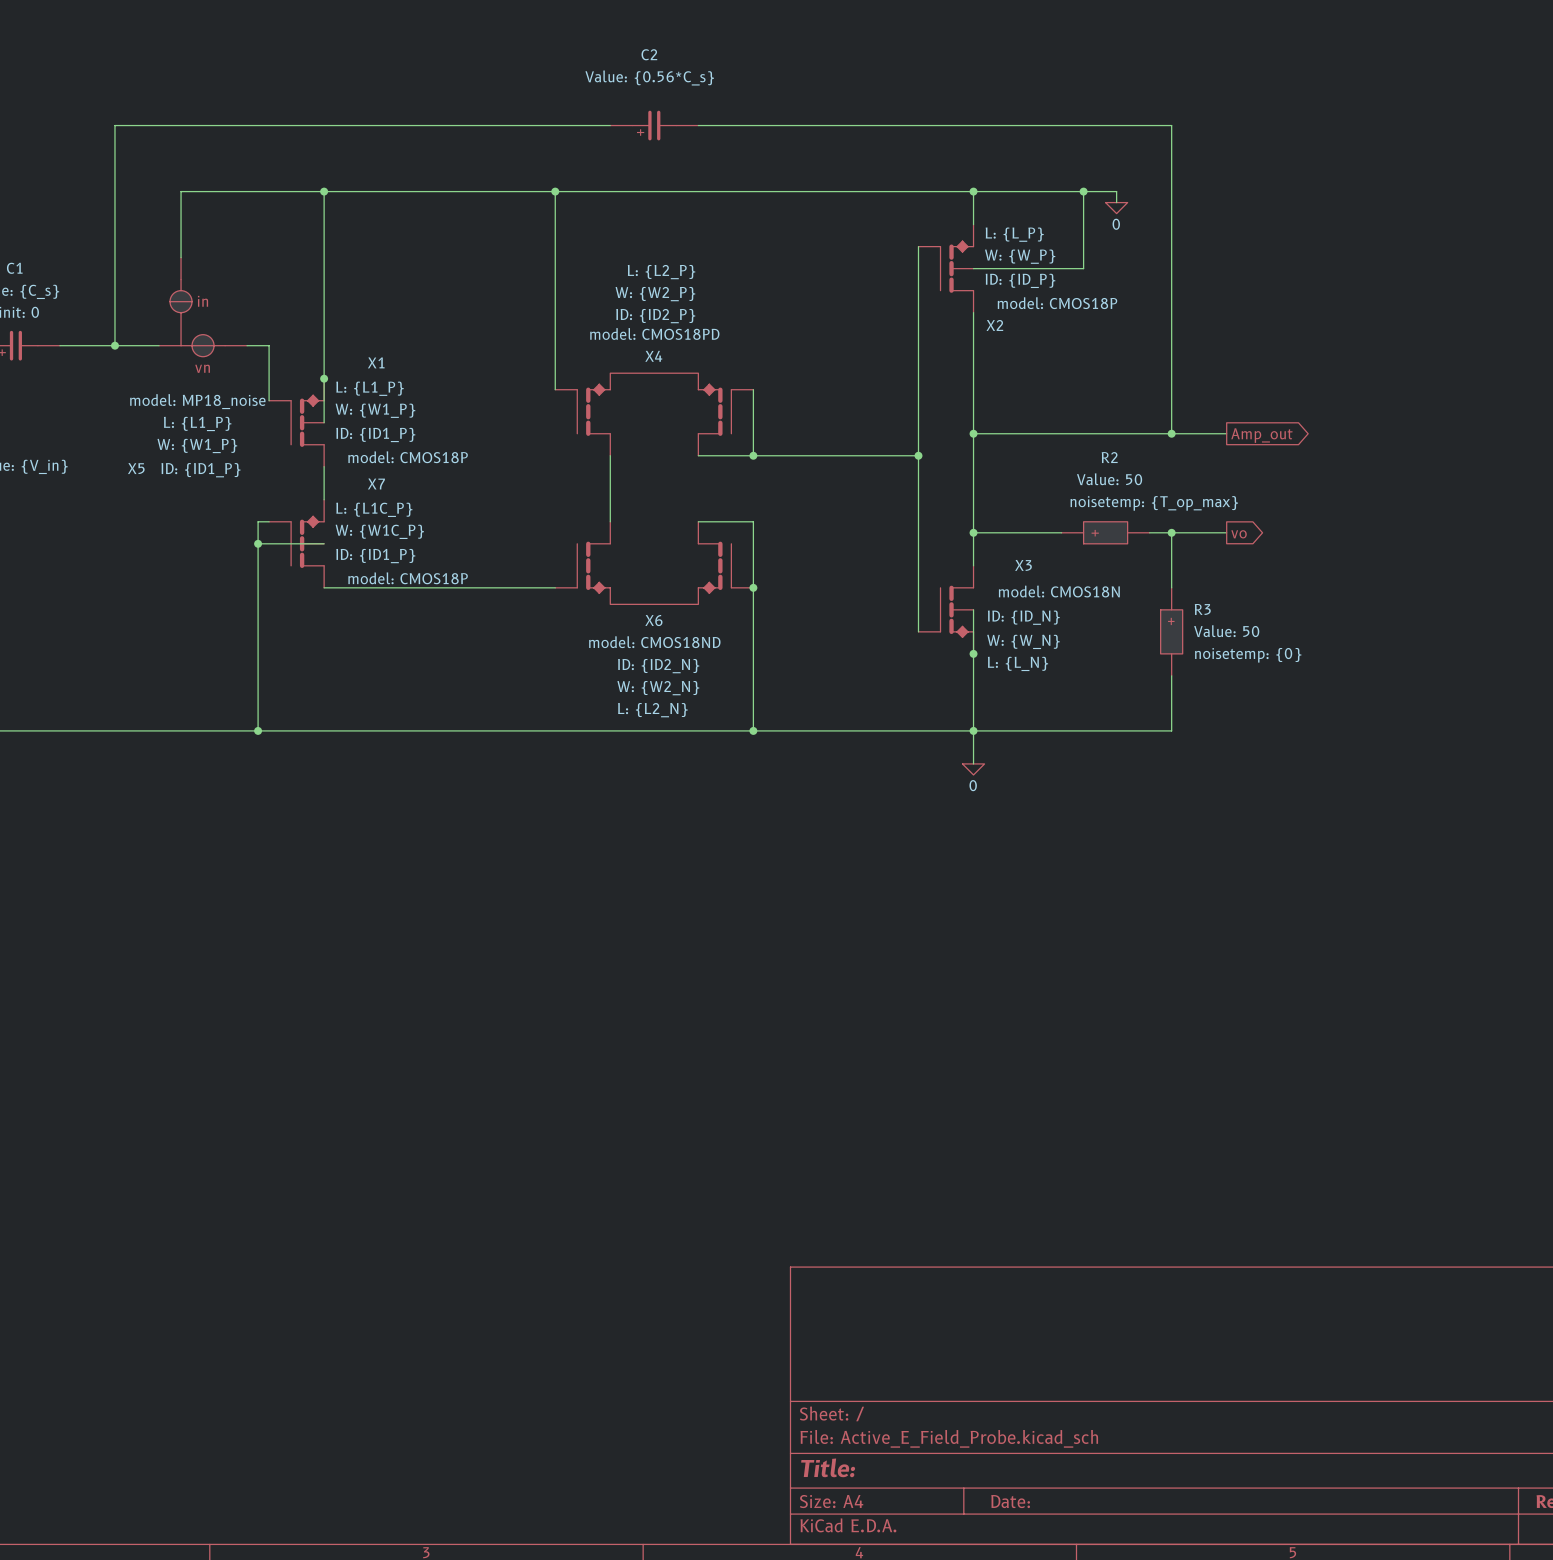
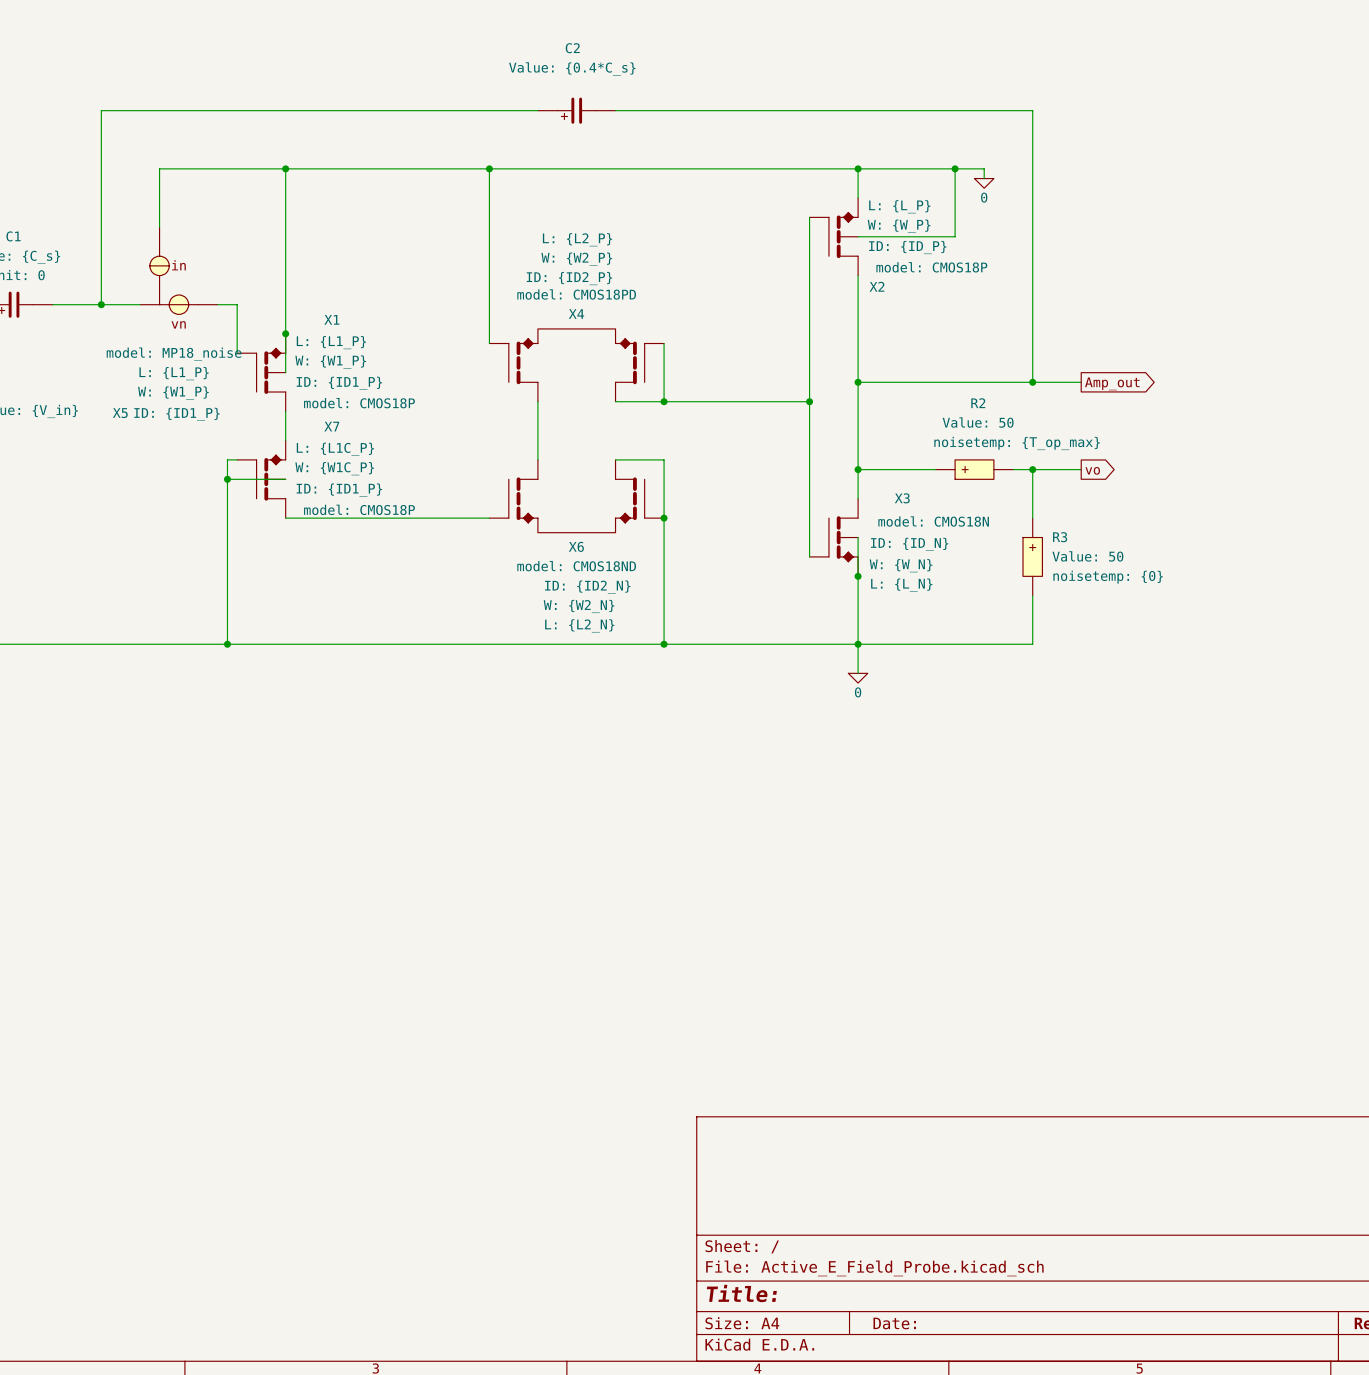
C2 value: Value: {0.56*C_s} (649, 77) -> Value: {0.4*C_s} (572, 68)

